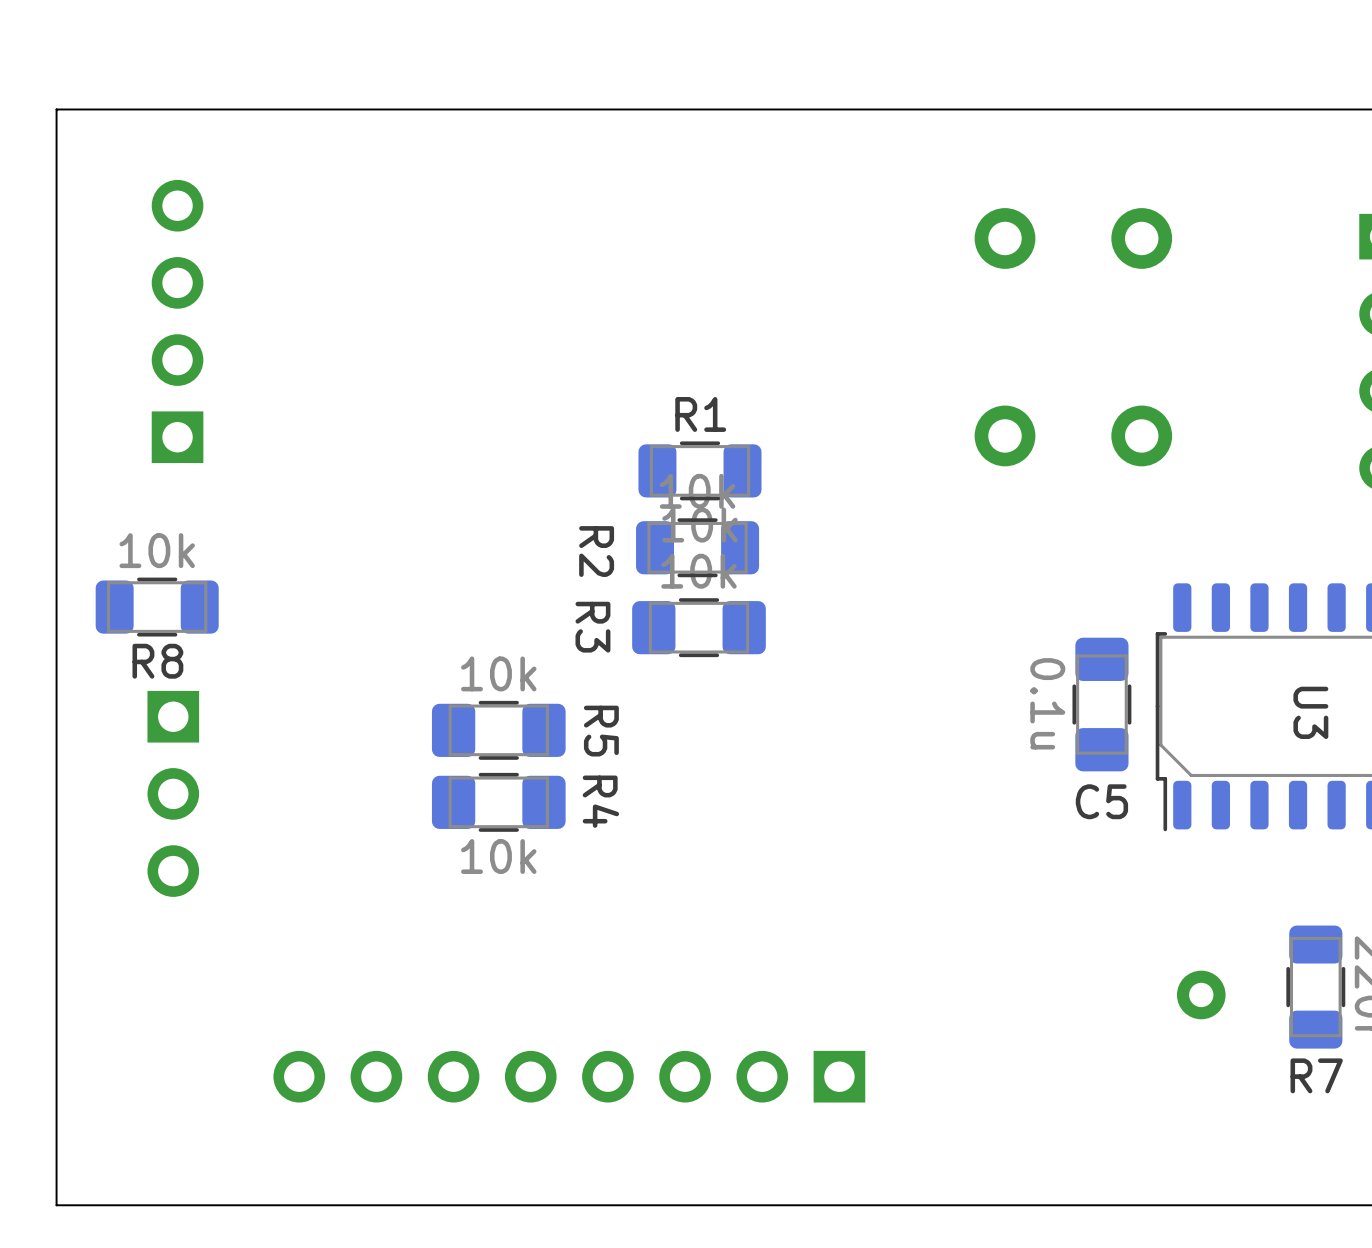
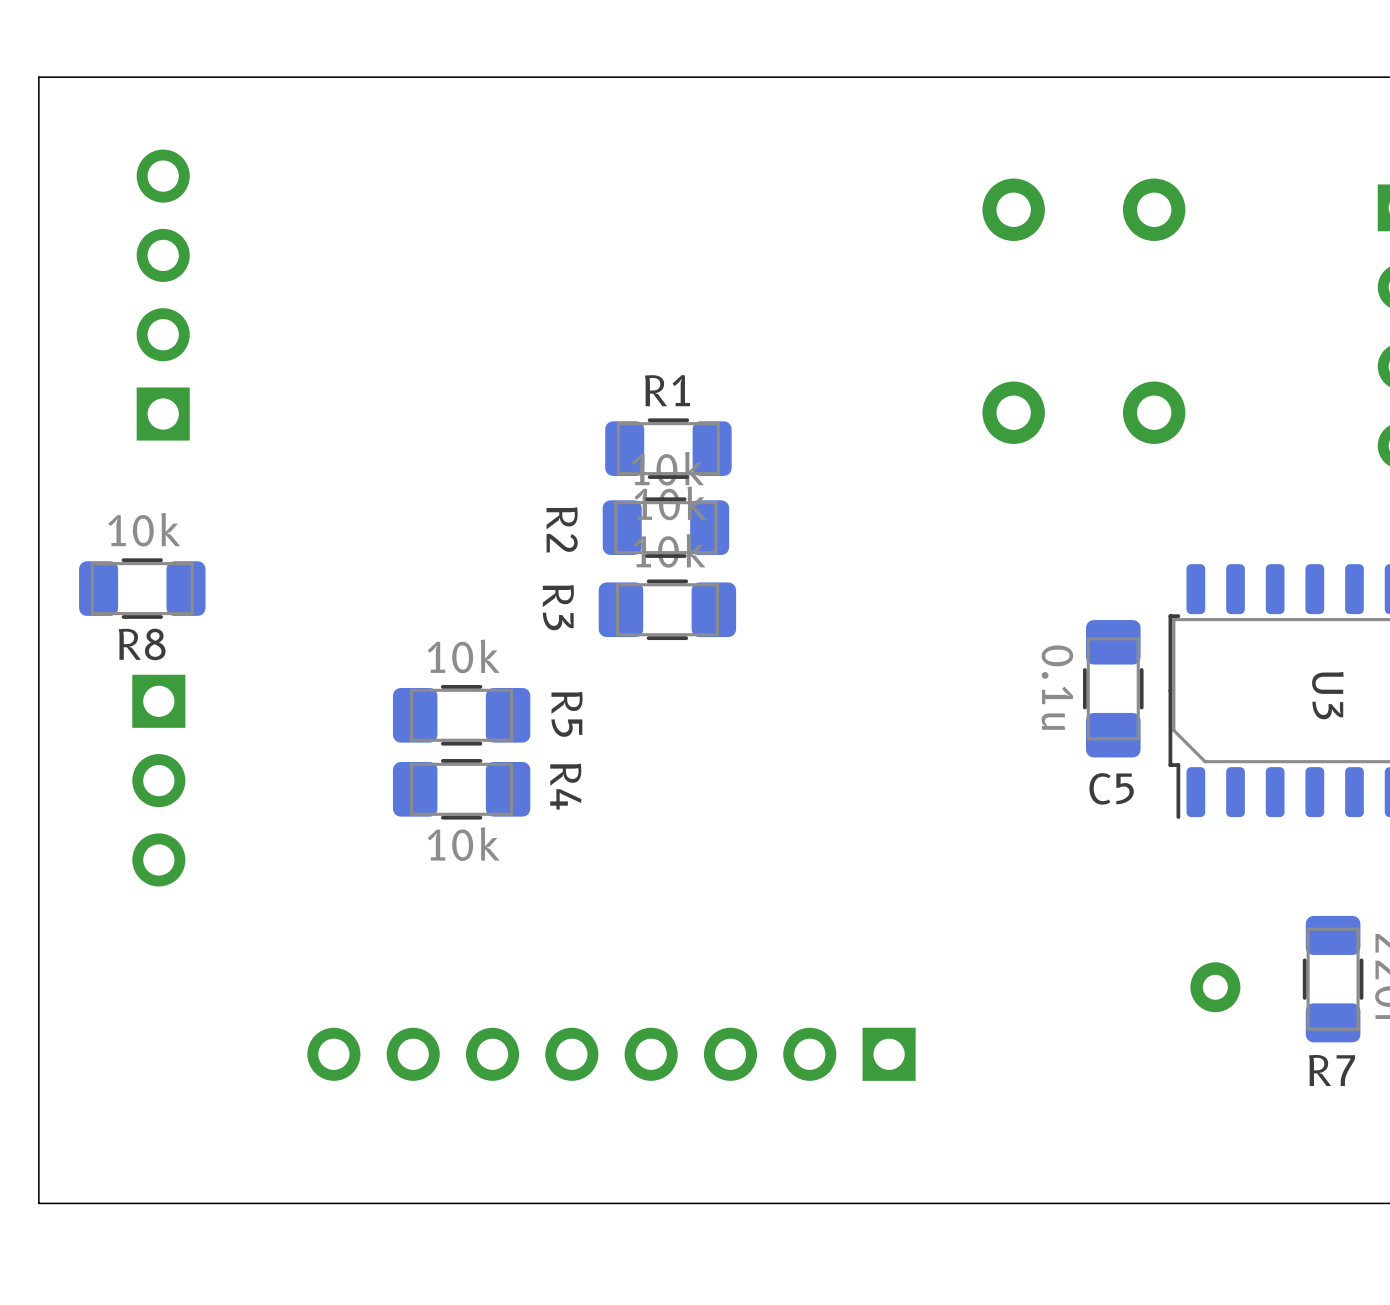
R1 position: (699, 470) -> (668, 448)
R2 position: (697, 547) -> (665, 527)
R3 position: (698, 627) -> (667, 609)
R5 position: (498, 730) -> (461, 715)
R4 position: (498, 802) -> (461, 789)
part position: (569, 1076) -> (611, 1054)

